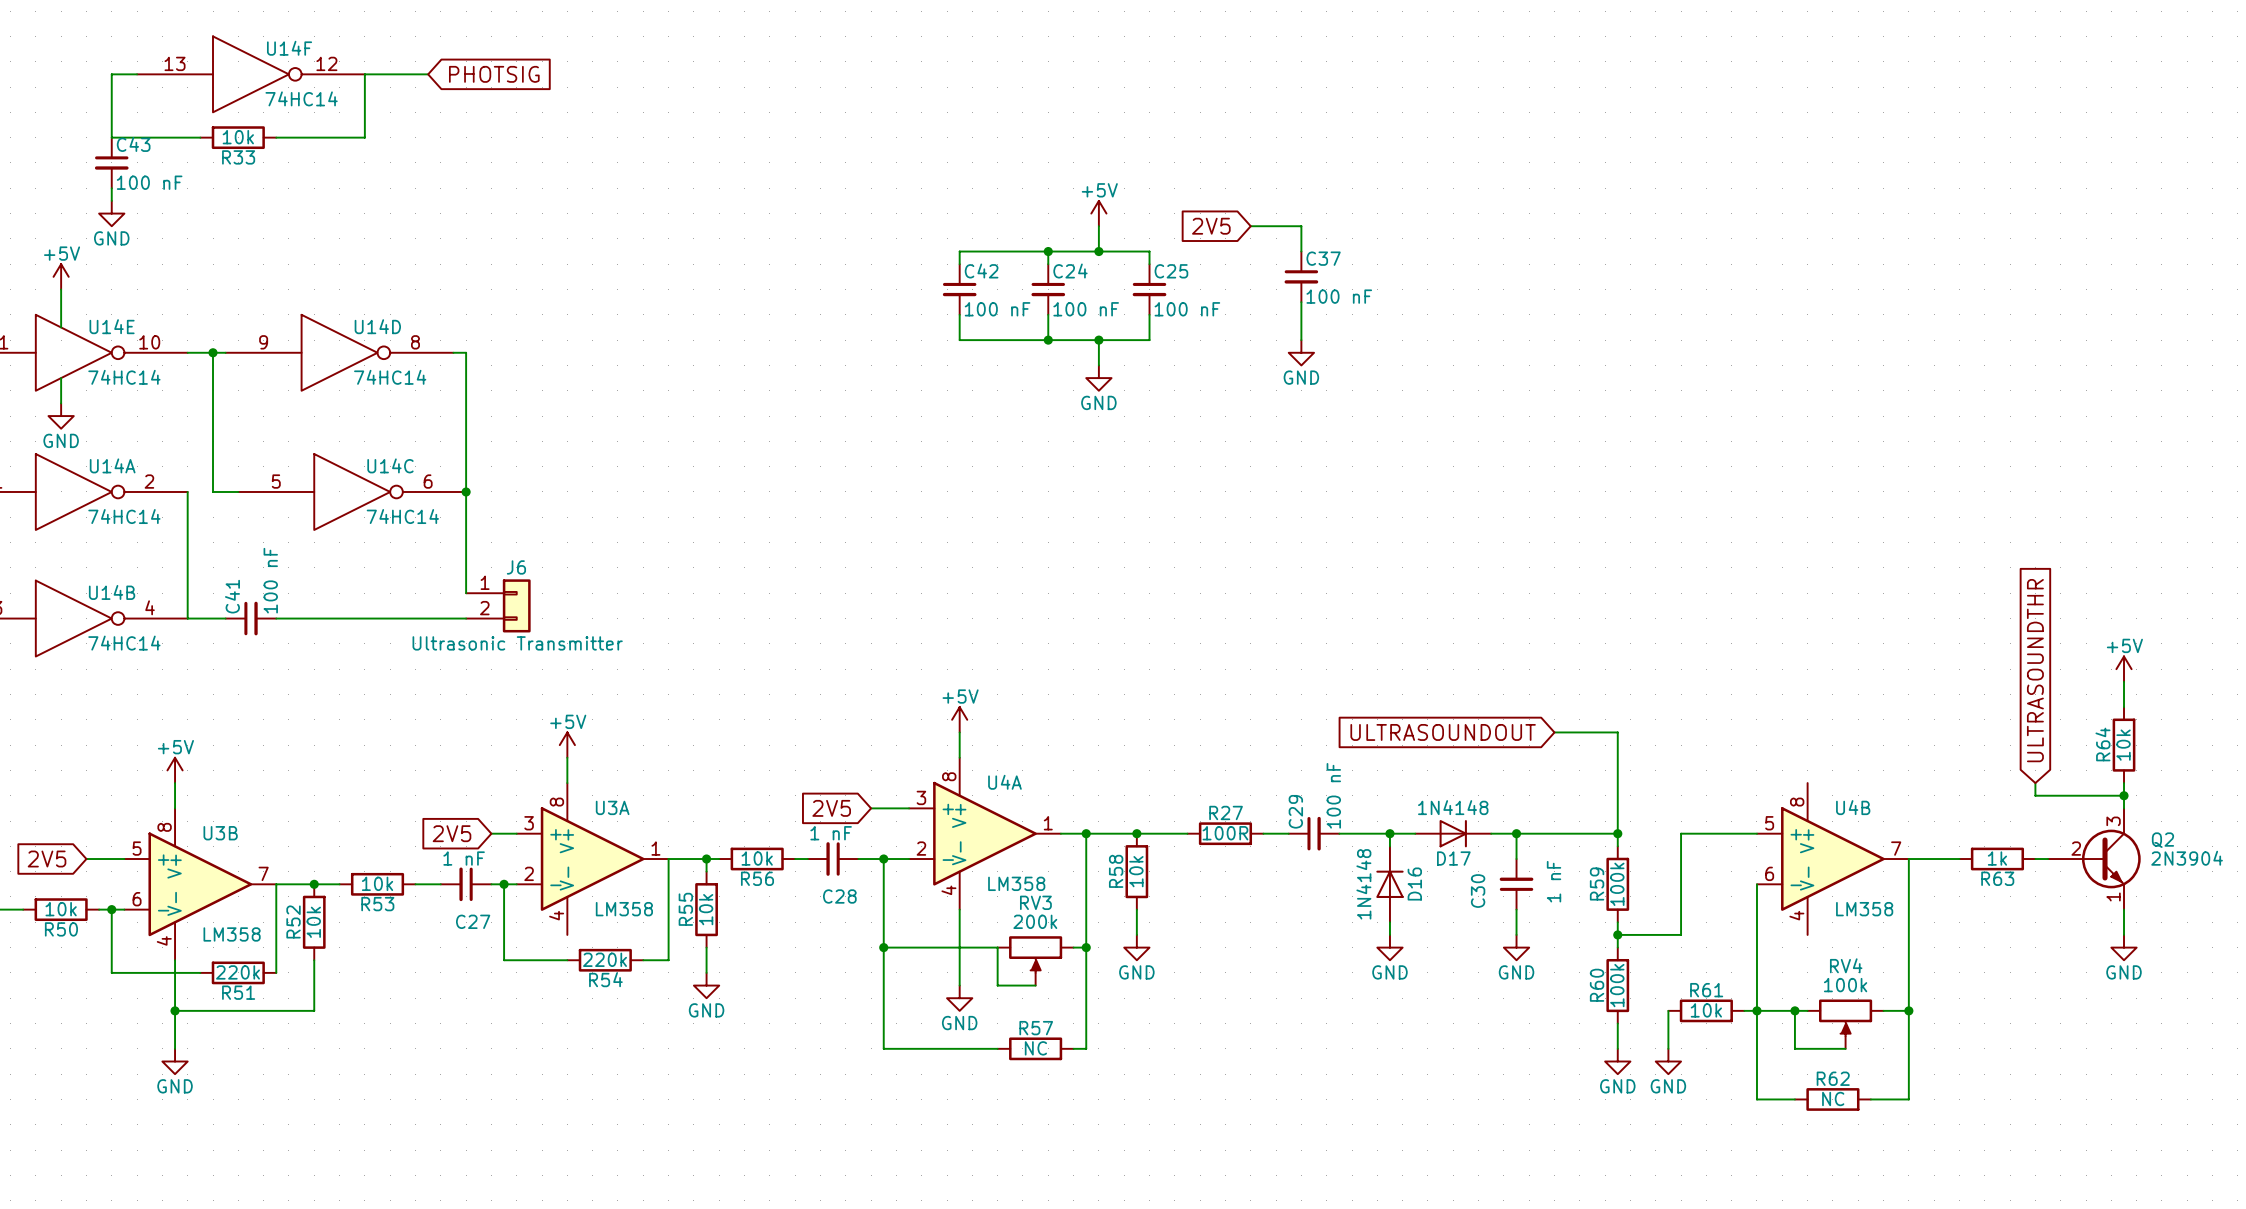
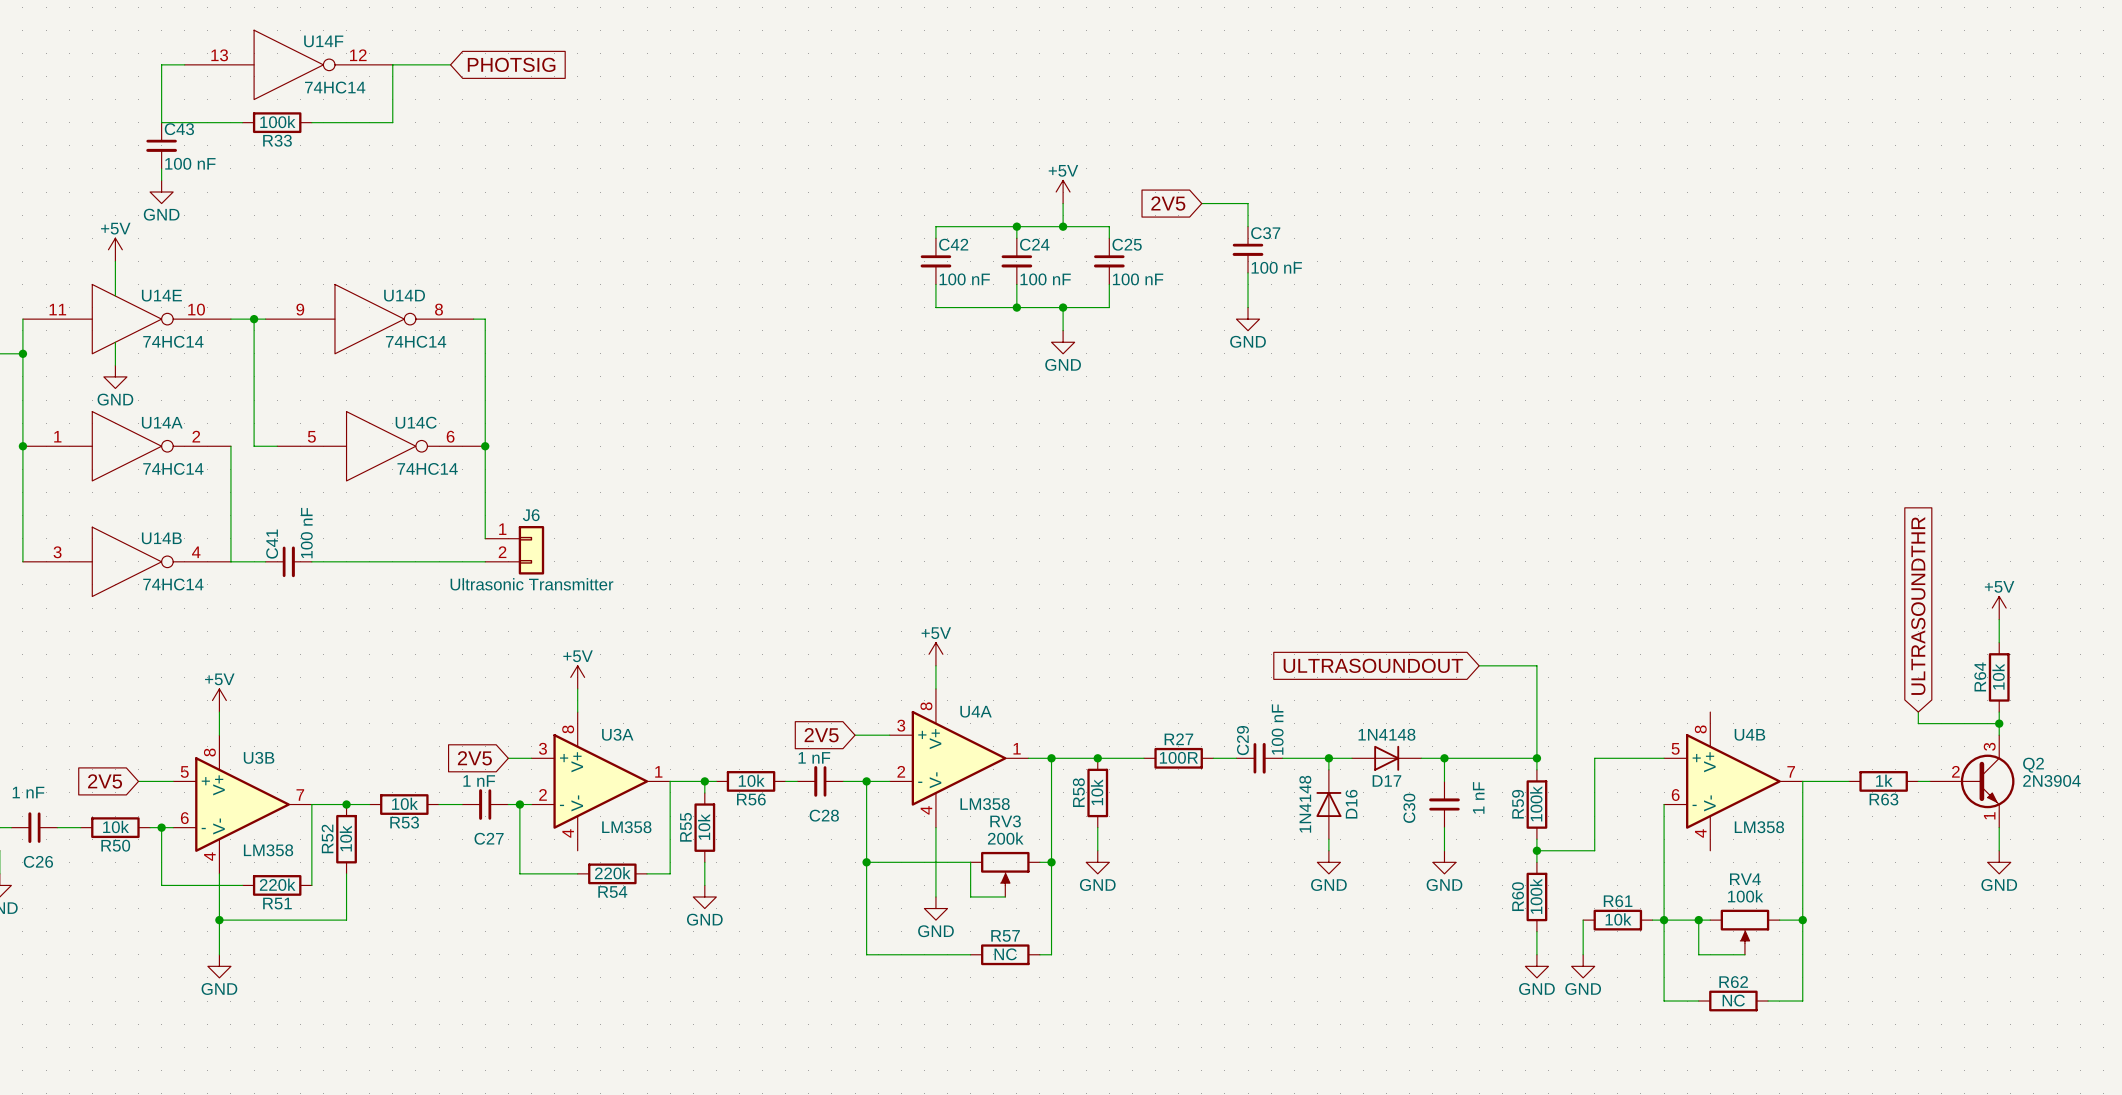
R33 value: 10k (238, 137) -> 100k (277, 122)

